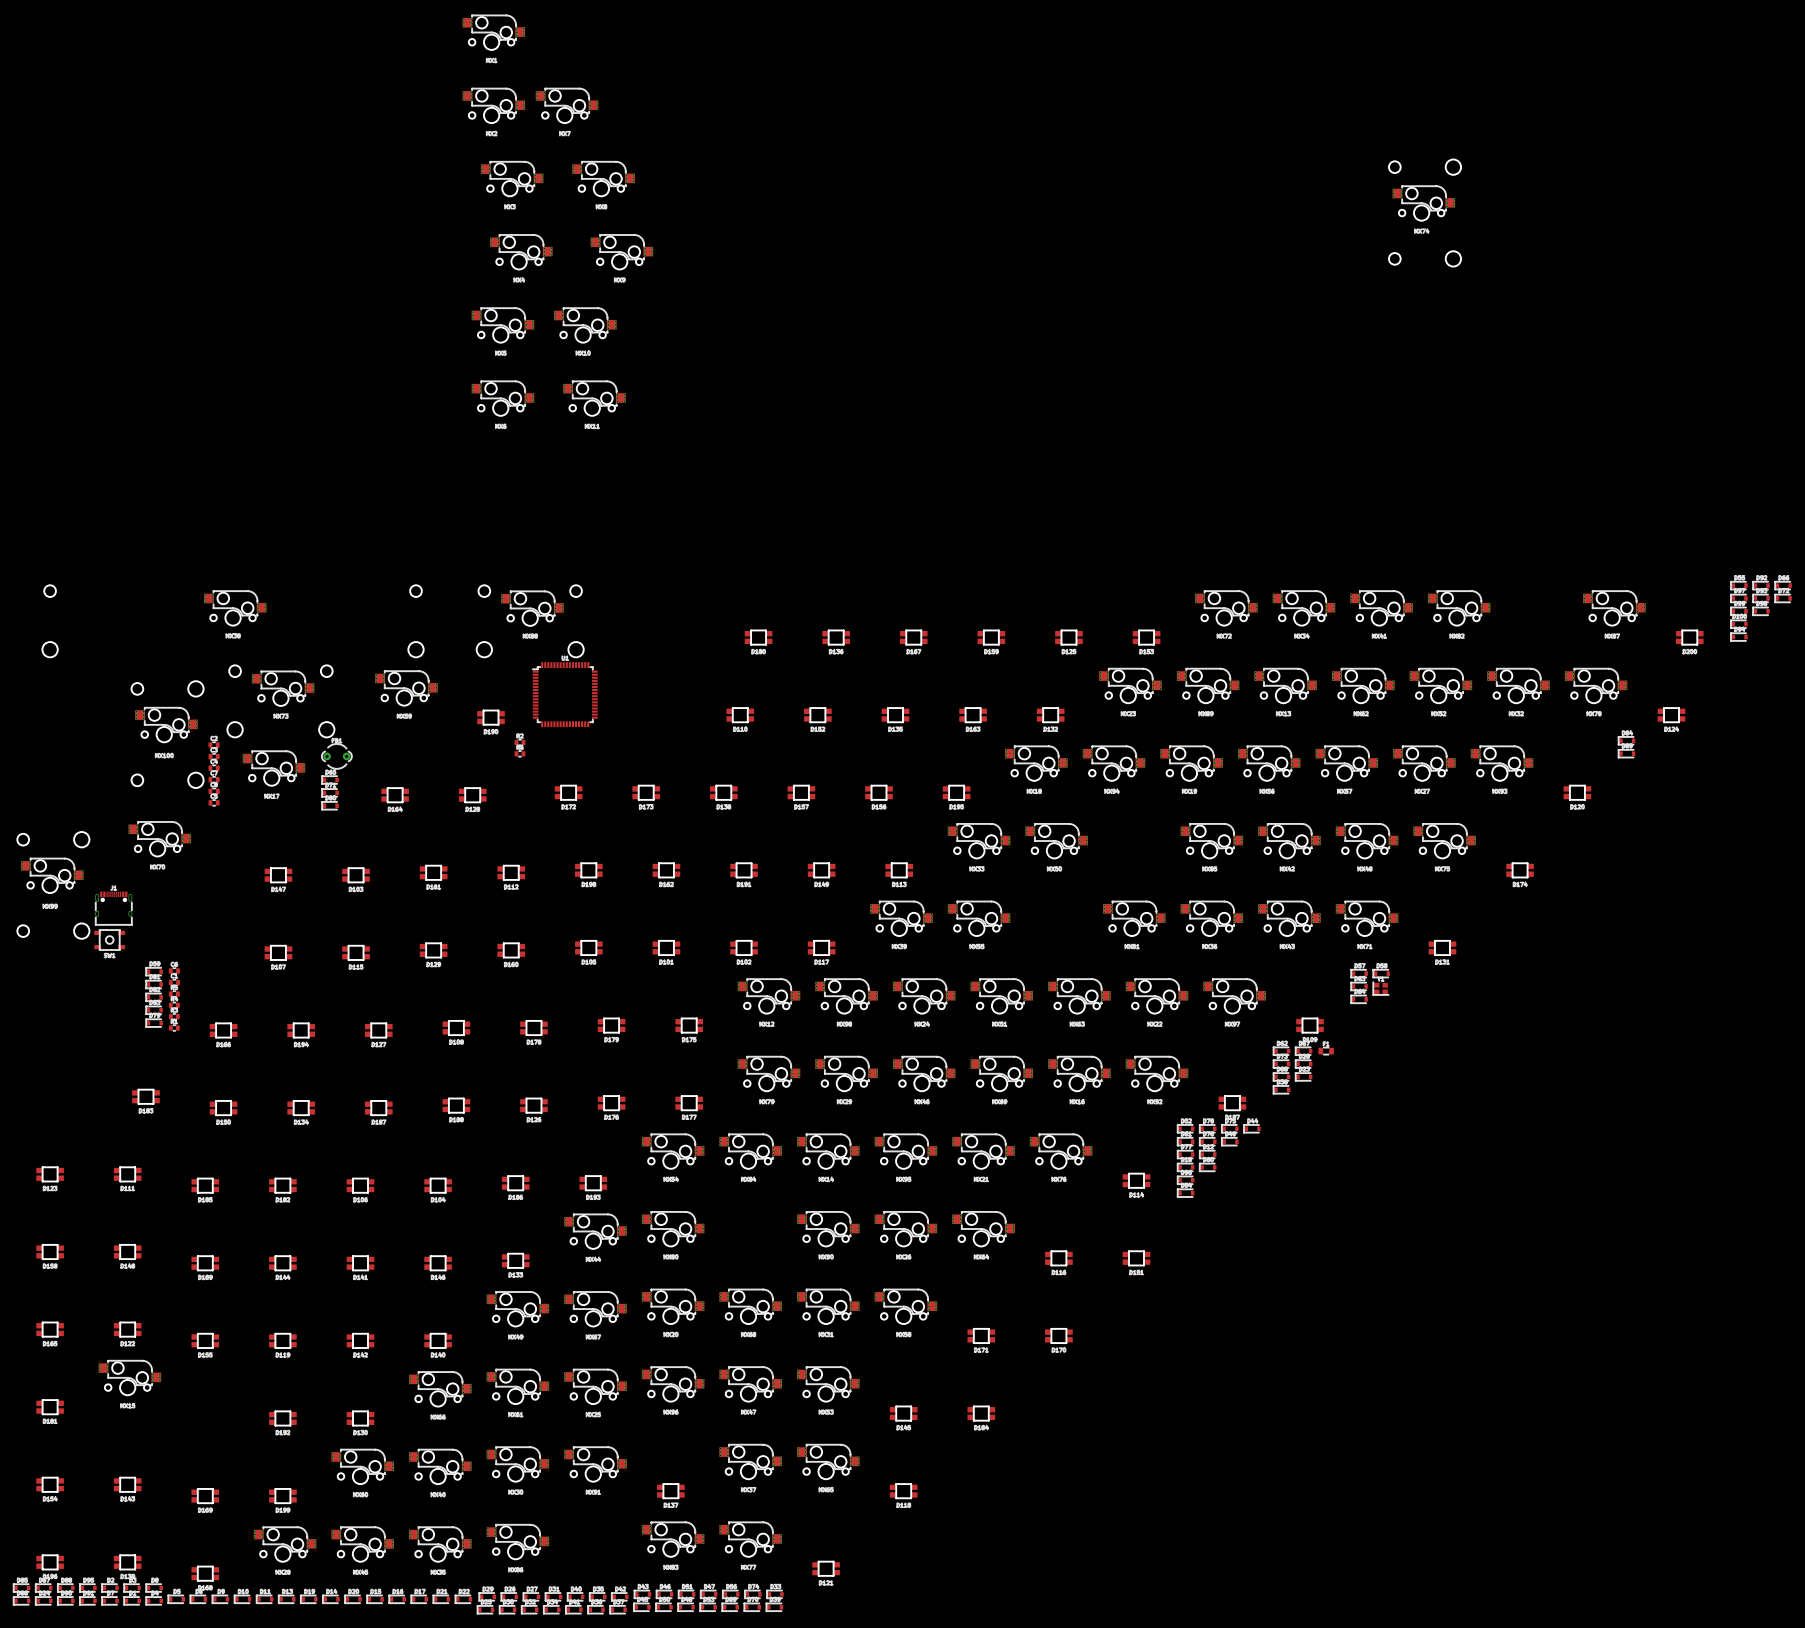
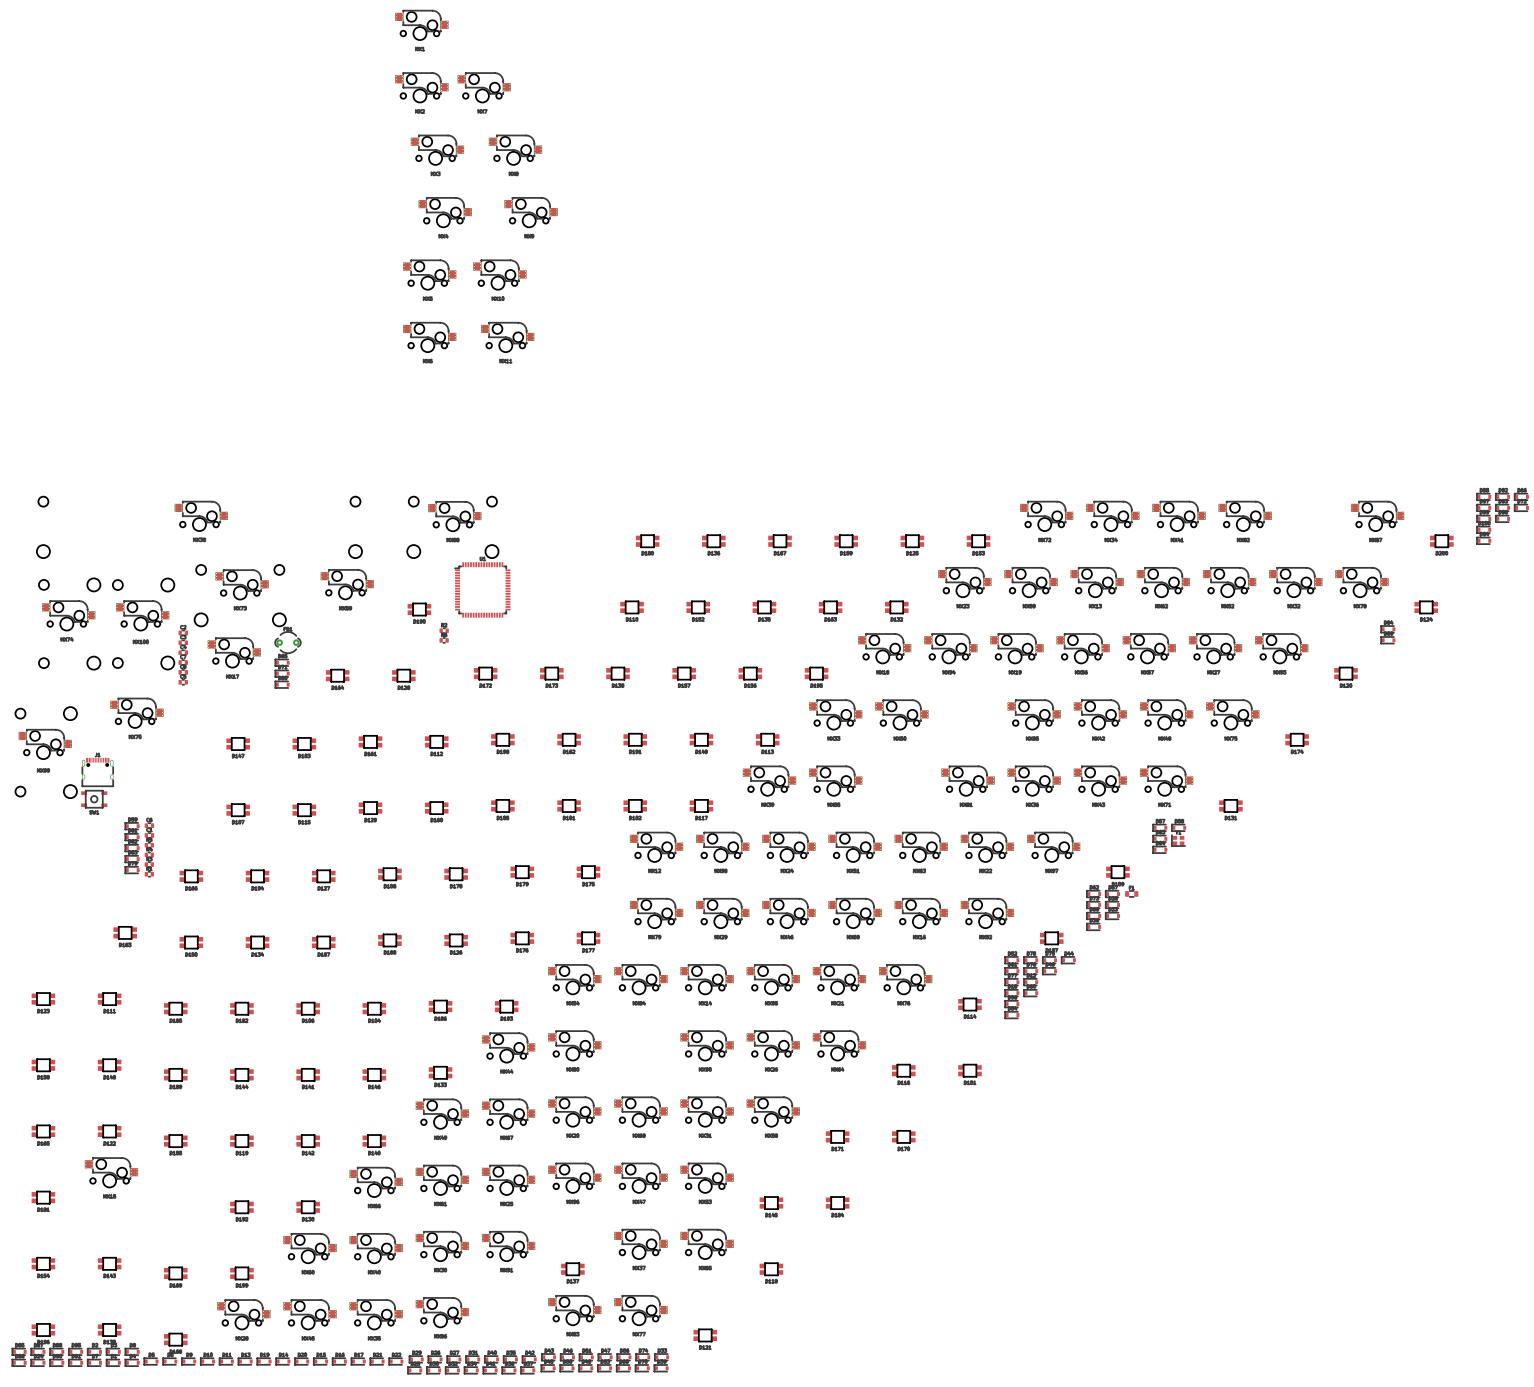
part position: (1425, 213) -> (69, 624)

